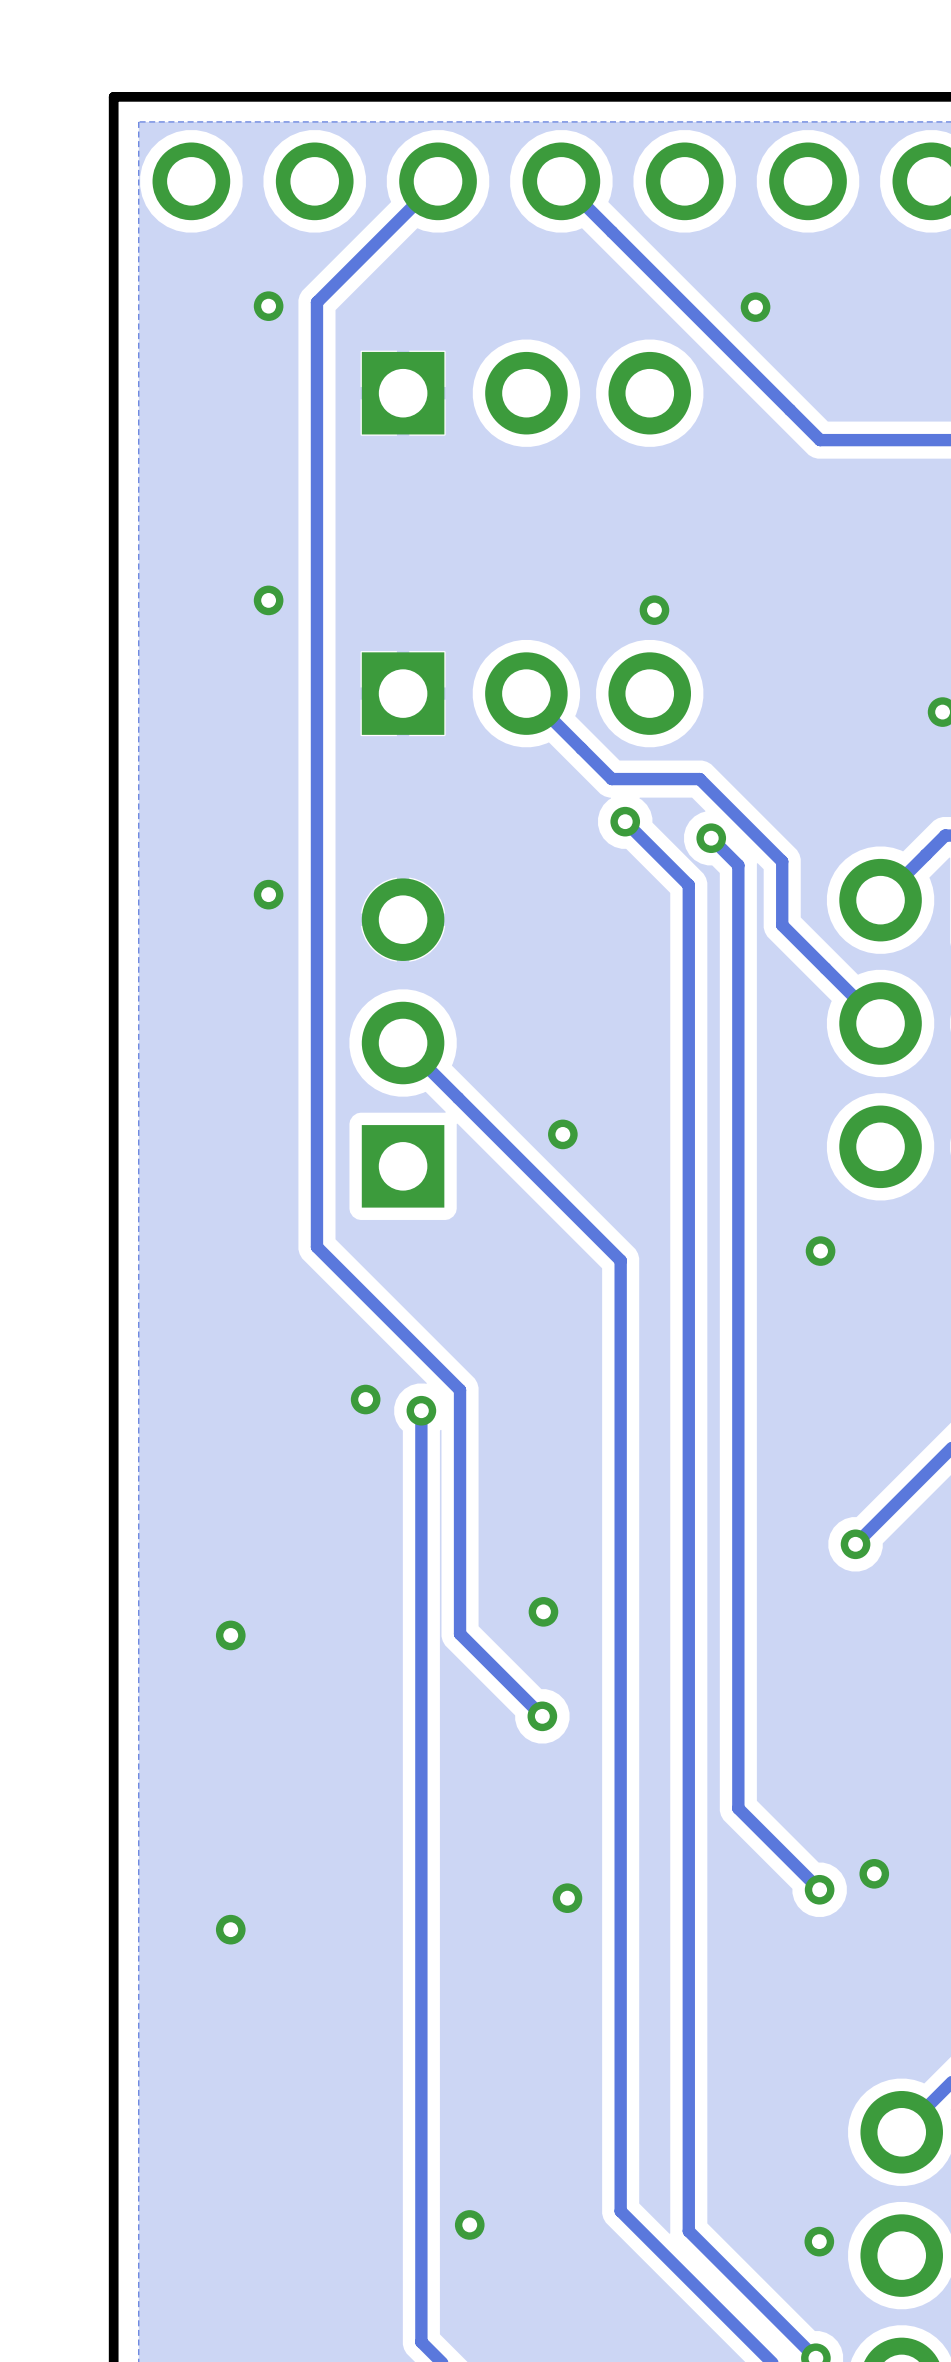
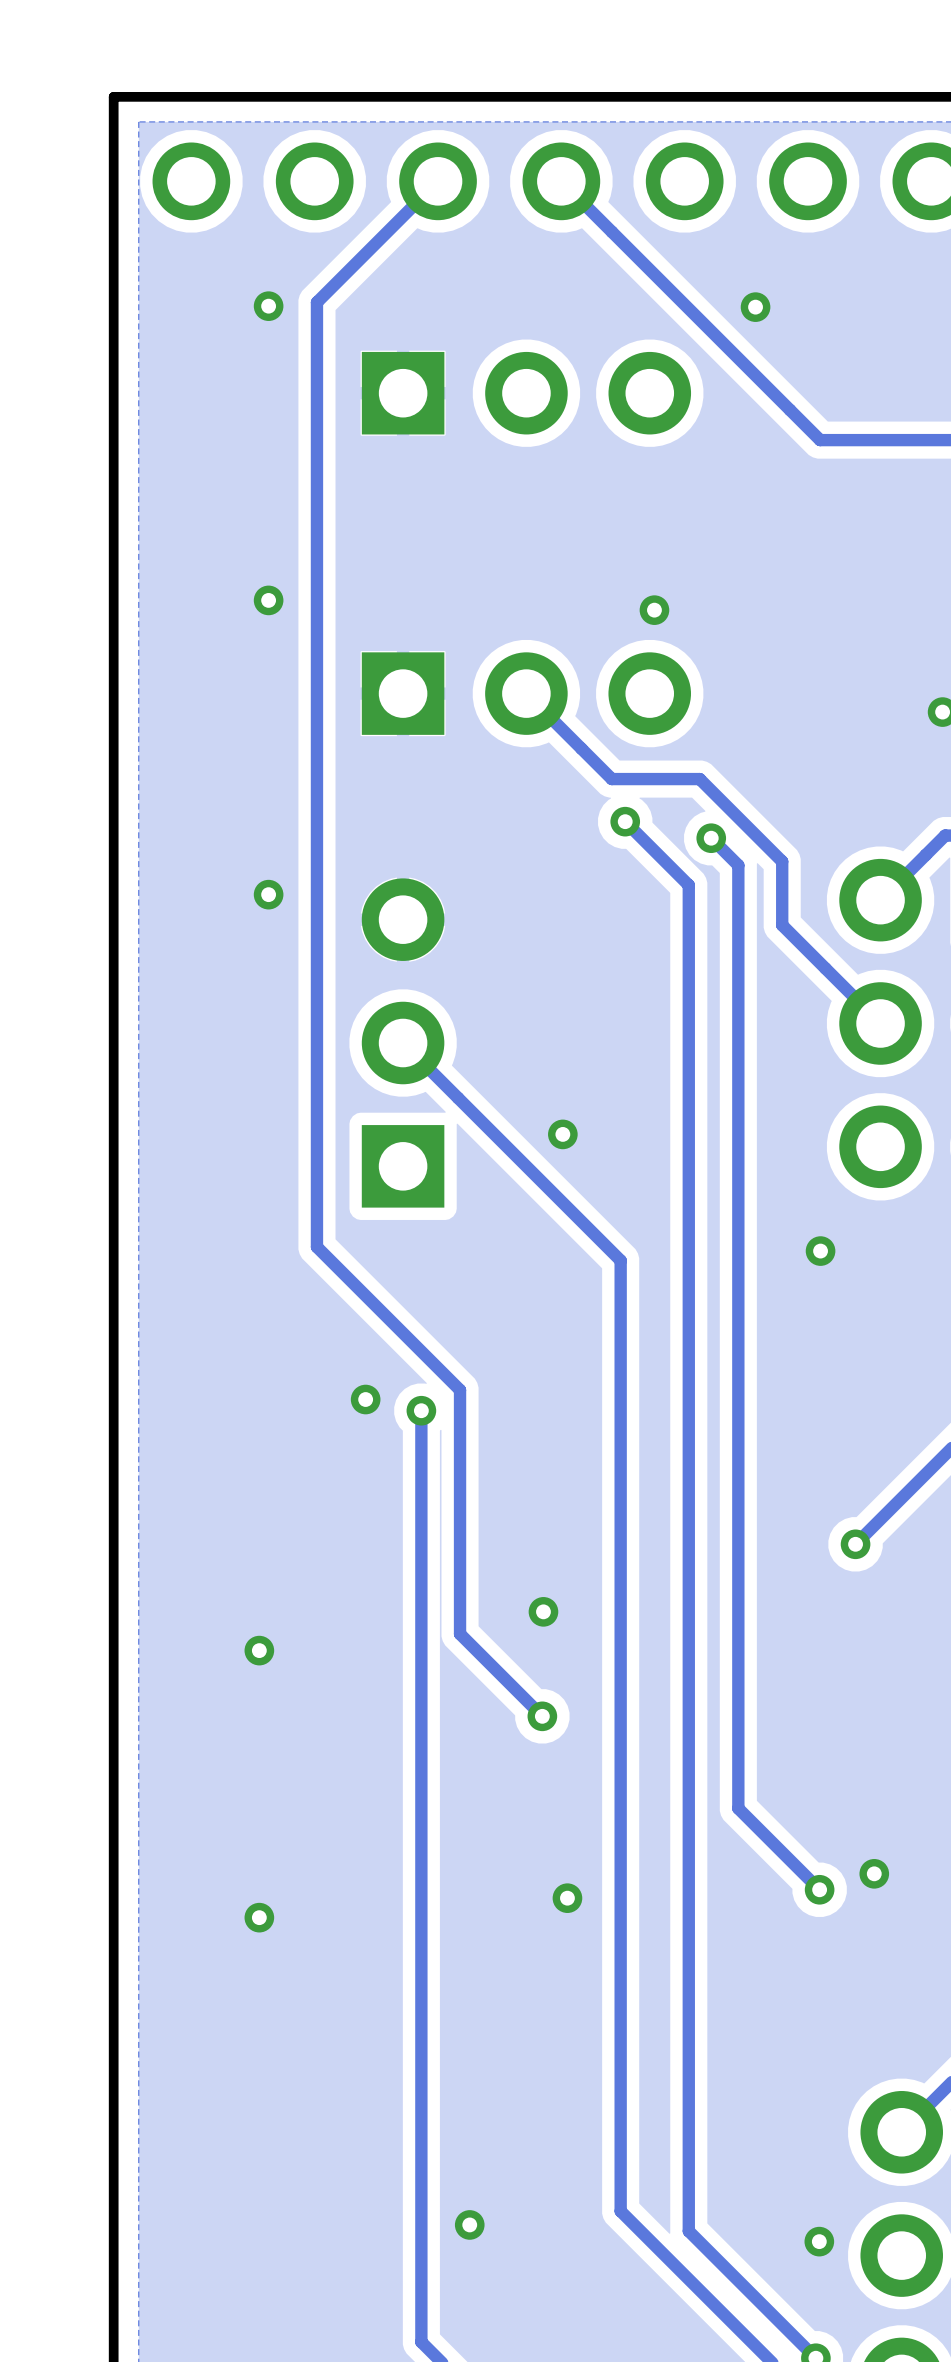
via position: (230, 1635) -> (259, 1650)
via position: (230, 1929) -> (259, 1917)

